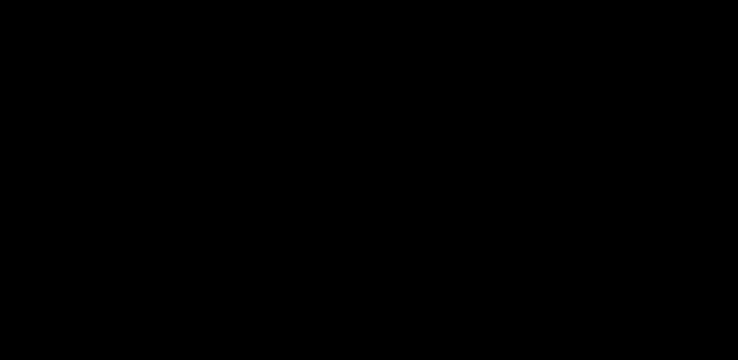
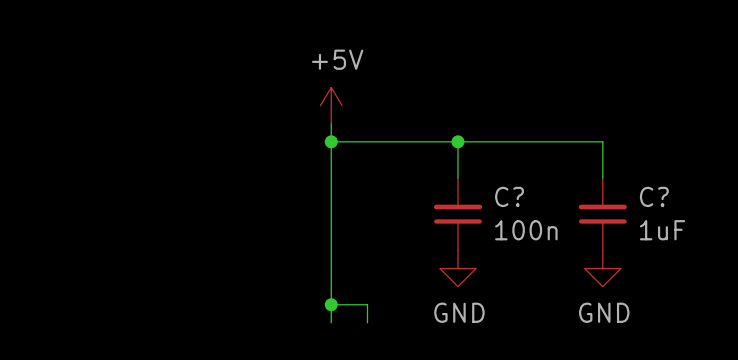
power symbol: none -> +5V (331, 105)
wire: none -> (331, 123) (331, 322)
wire: none -> (331, 141) (602, 141) (602, 178)
junction: none -> (331, 141)
wire: none -> (457, 141) (457, 178)
junction: none -> (457, 141)
C?: none -> 100n (457, 214)
C?: none -> 1uF (602, 214)
power symbol: none -> GND (457, 268)
power symbol: none -> GND (602, 268)
wire: none -> (331, 304) (367, 304) (367, 322)
junction: none -> (331, 304)

